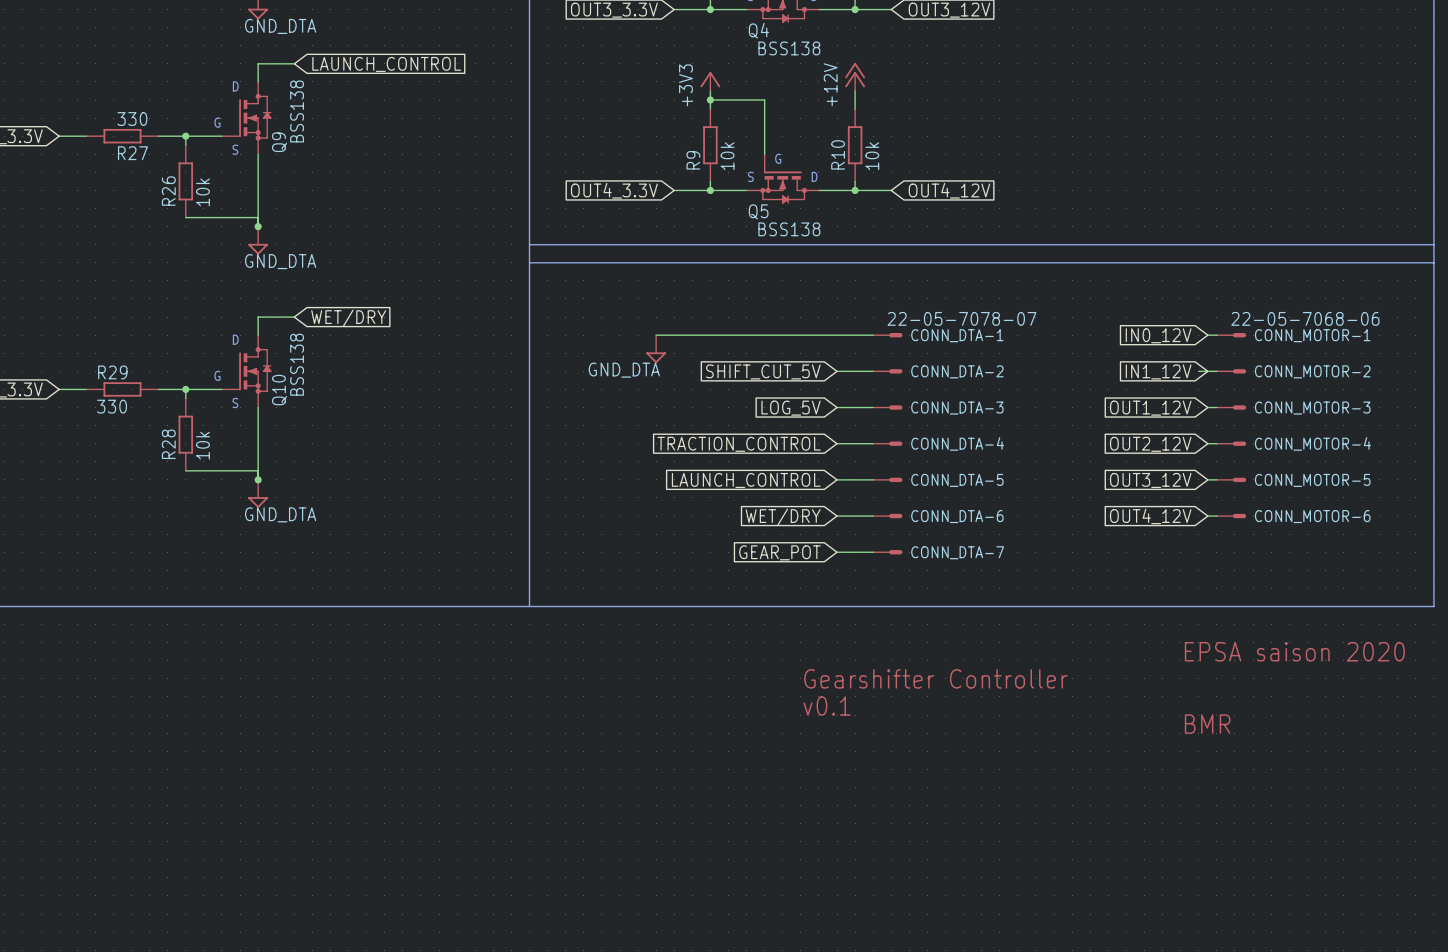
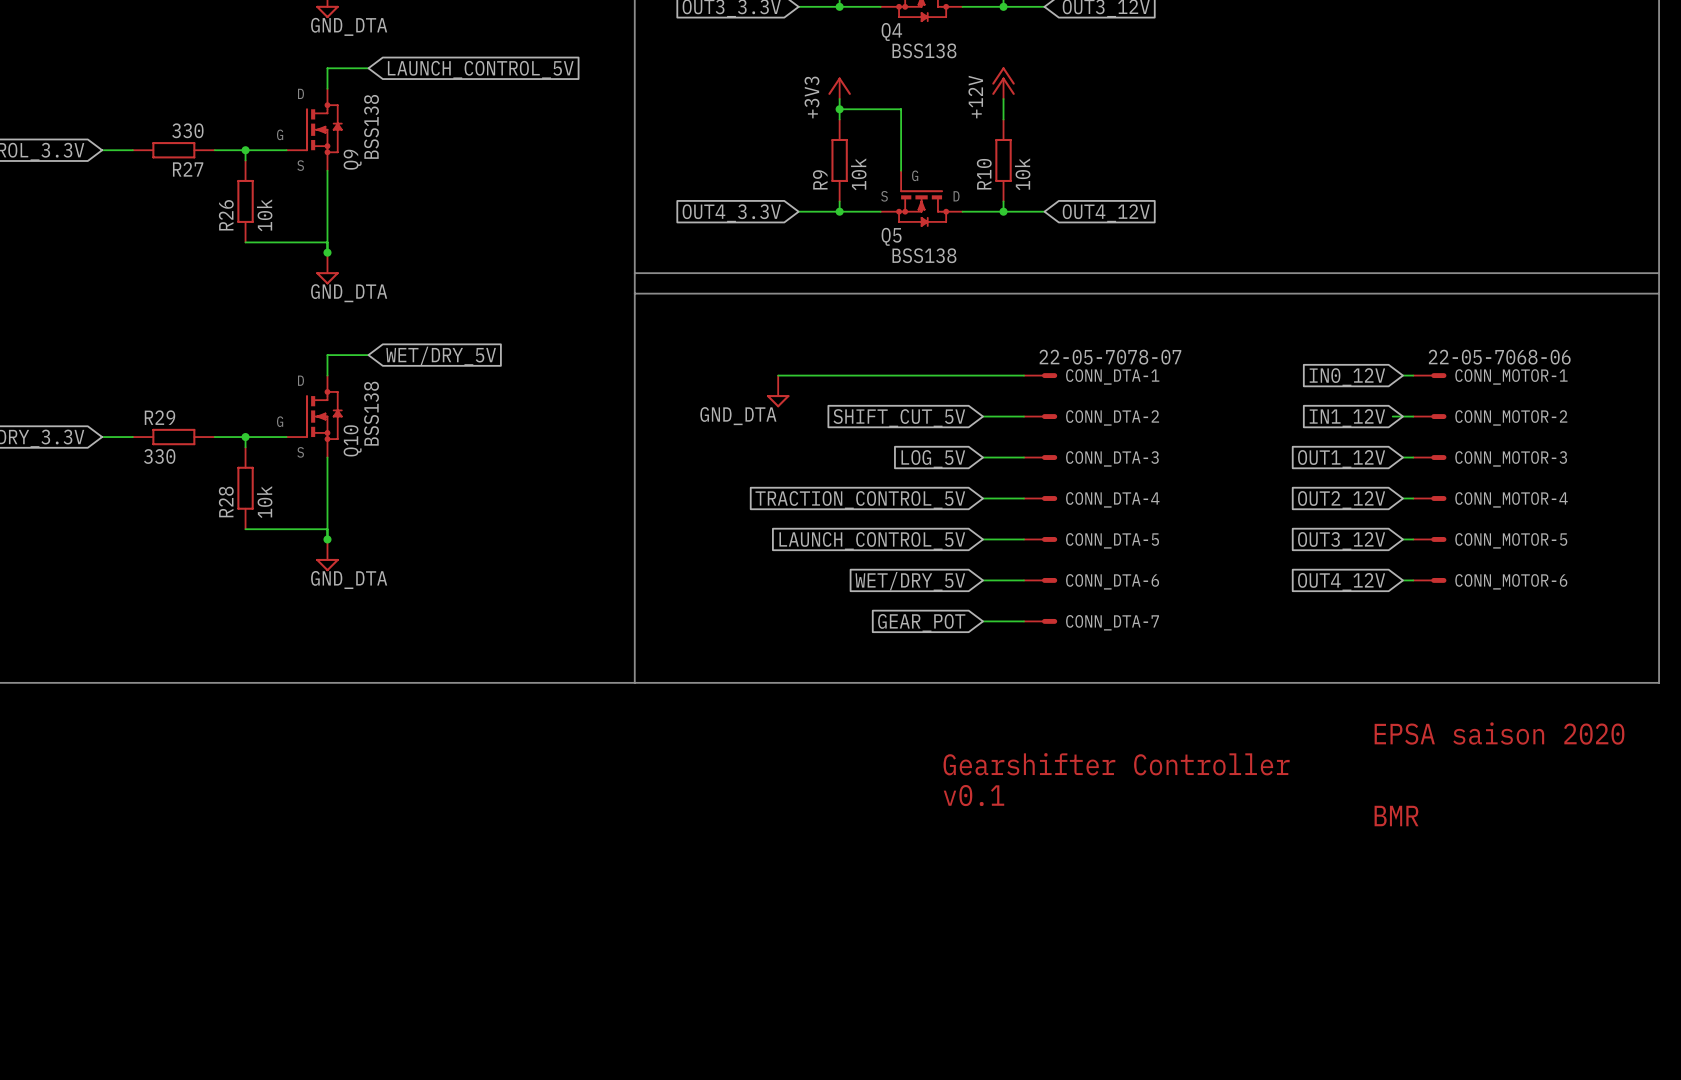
global label: LAUNCH_CONTROL (386, 64) -> LAUNCH_CONTROL_5V (480, 69)
global label: WET/DRY (348, 318) -> WET/DRY_5V (441, 356)
global label: TRACTION_CONTROL (738, 444) -> TRACTION_CONTROL_5V (860, 500)
global label: LAUNCH_CONTROL (746, 480) -> LAUNCH_CONTROL_5V (872, 541)
global label: WET/DRY (783, 517) -> WET/DRY_5V (910, 581)

